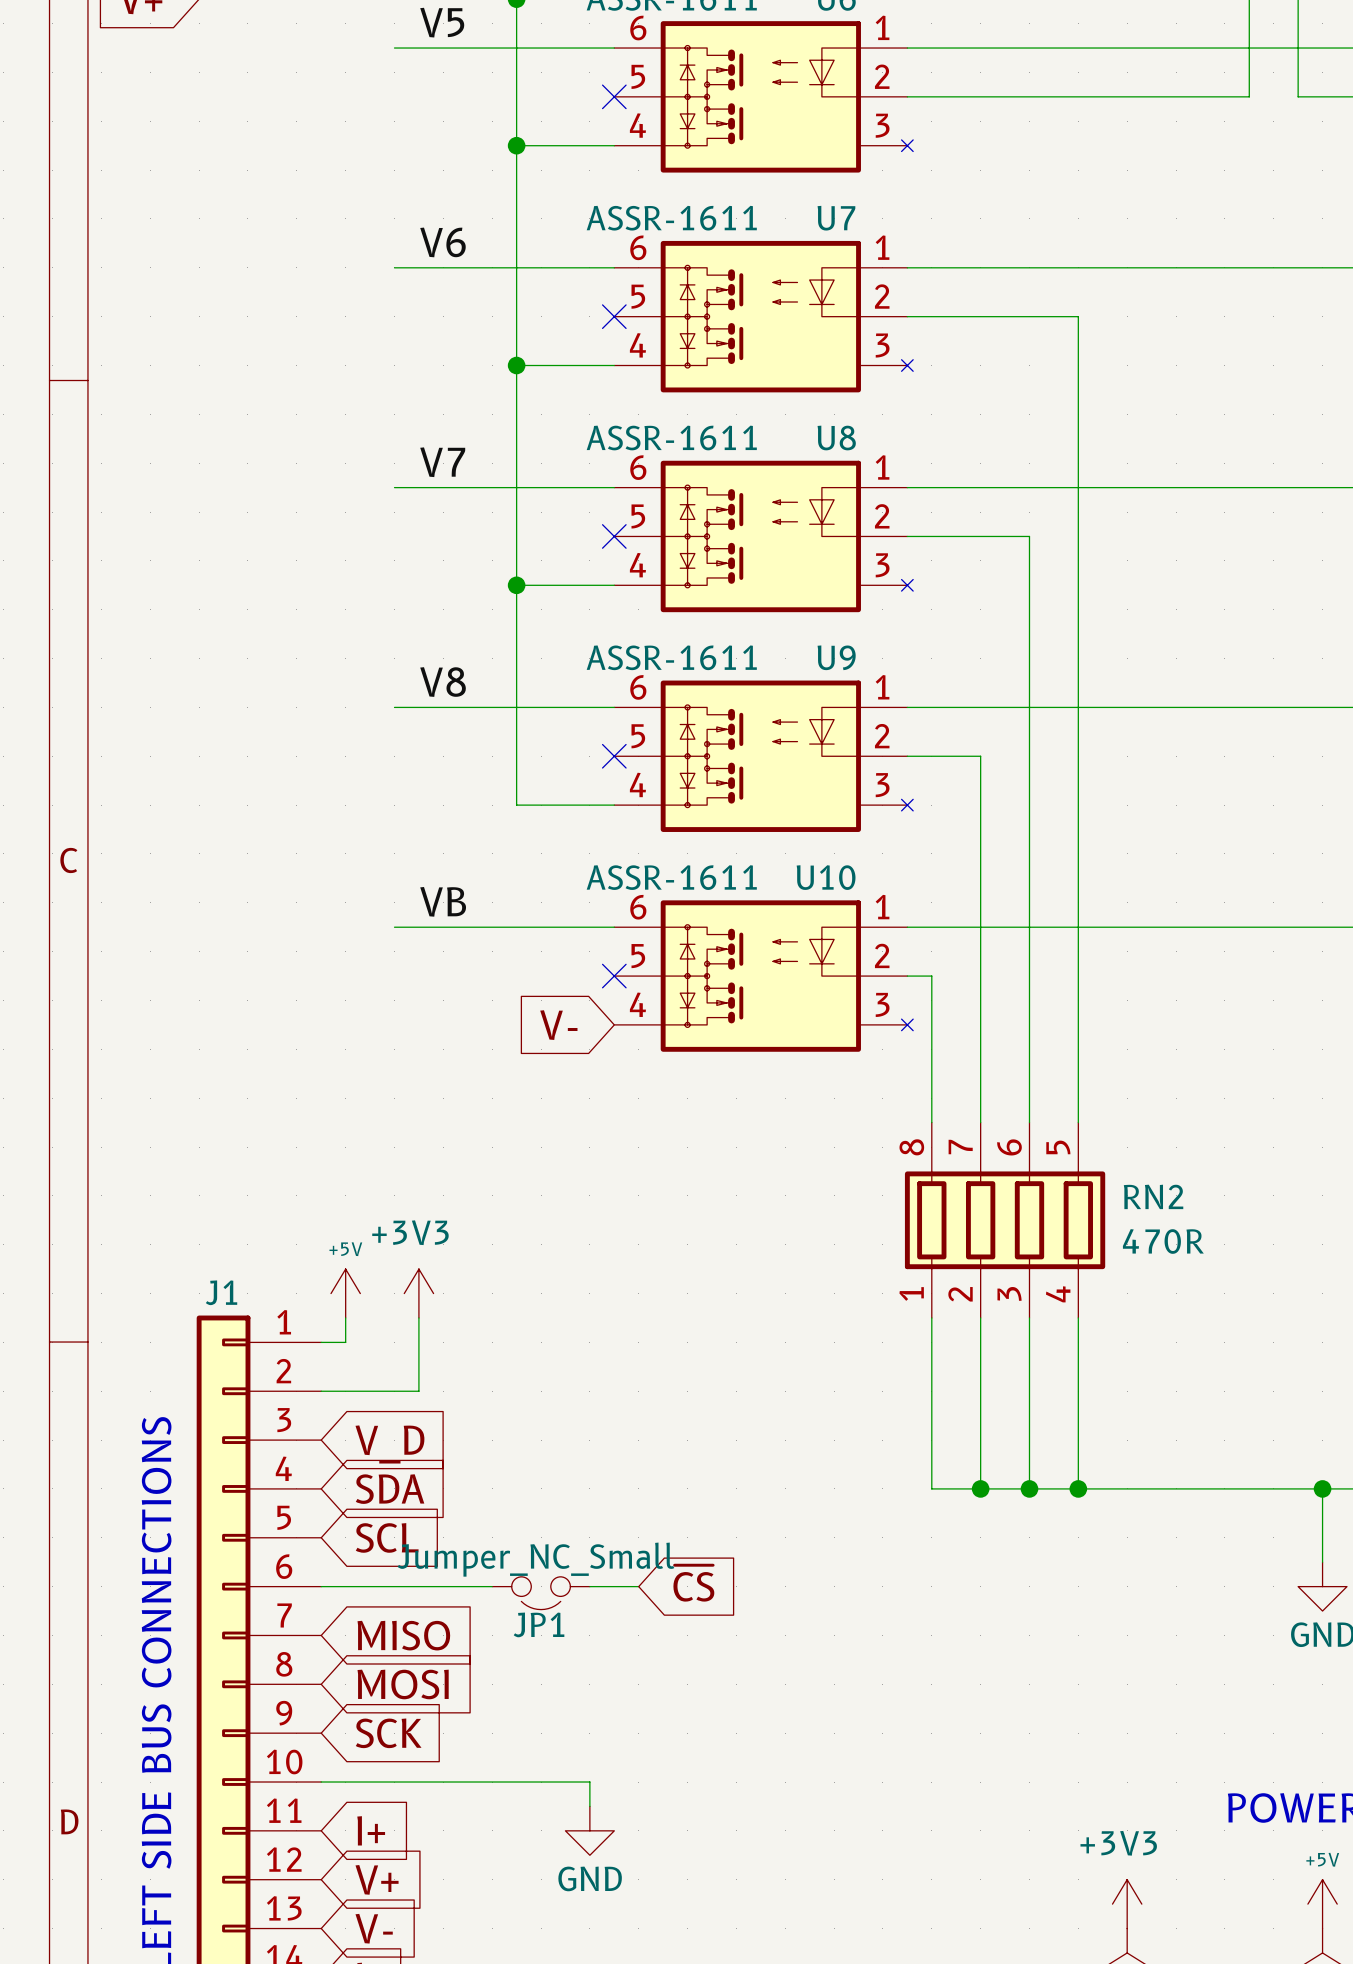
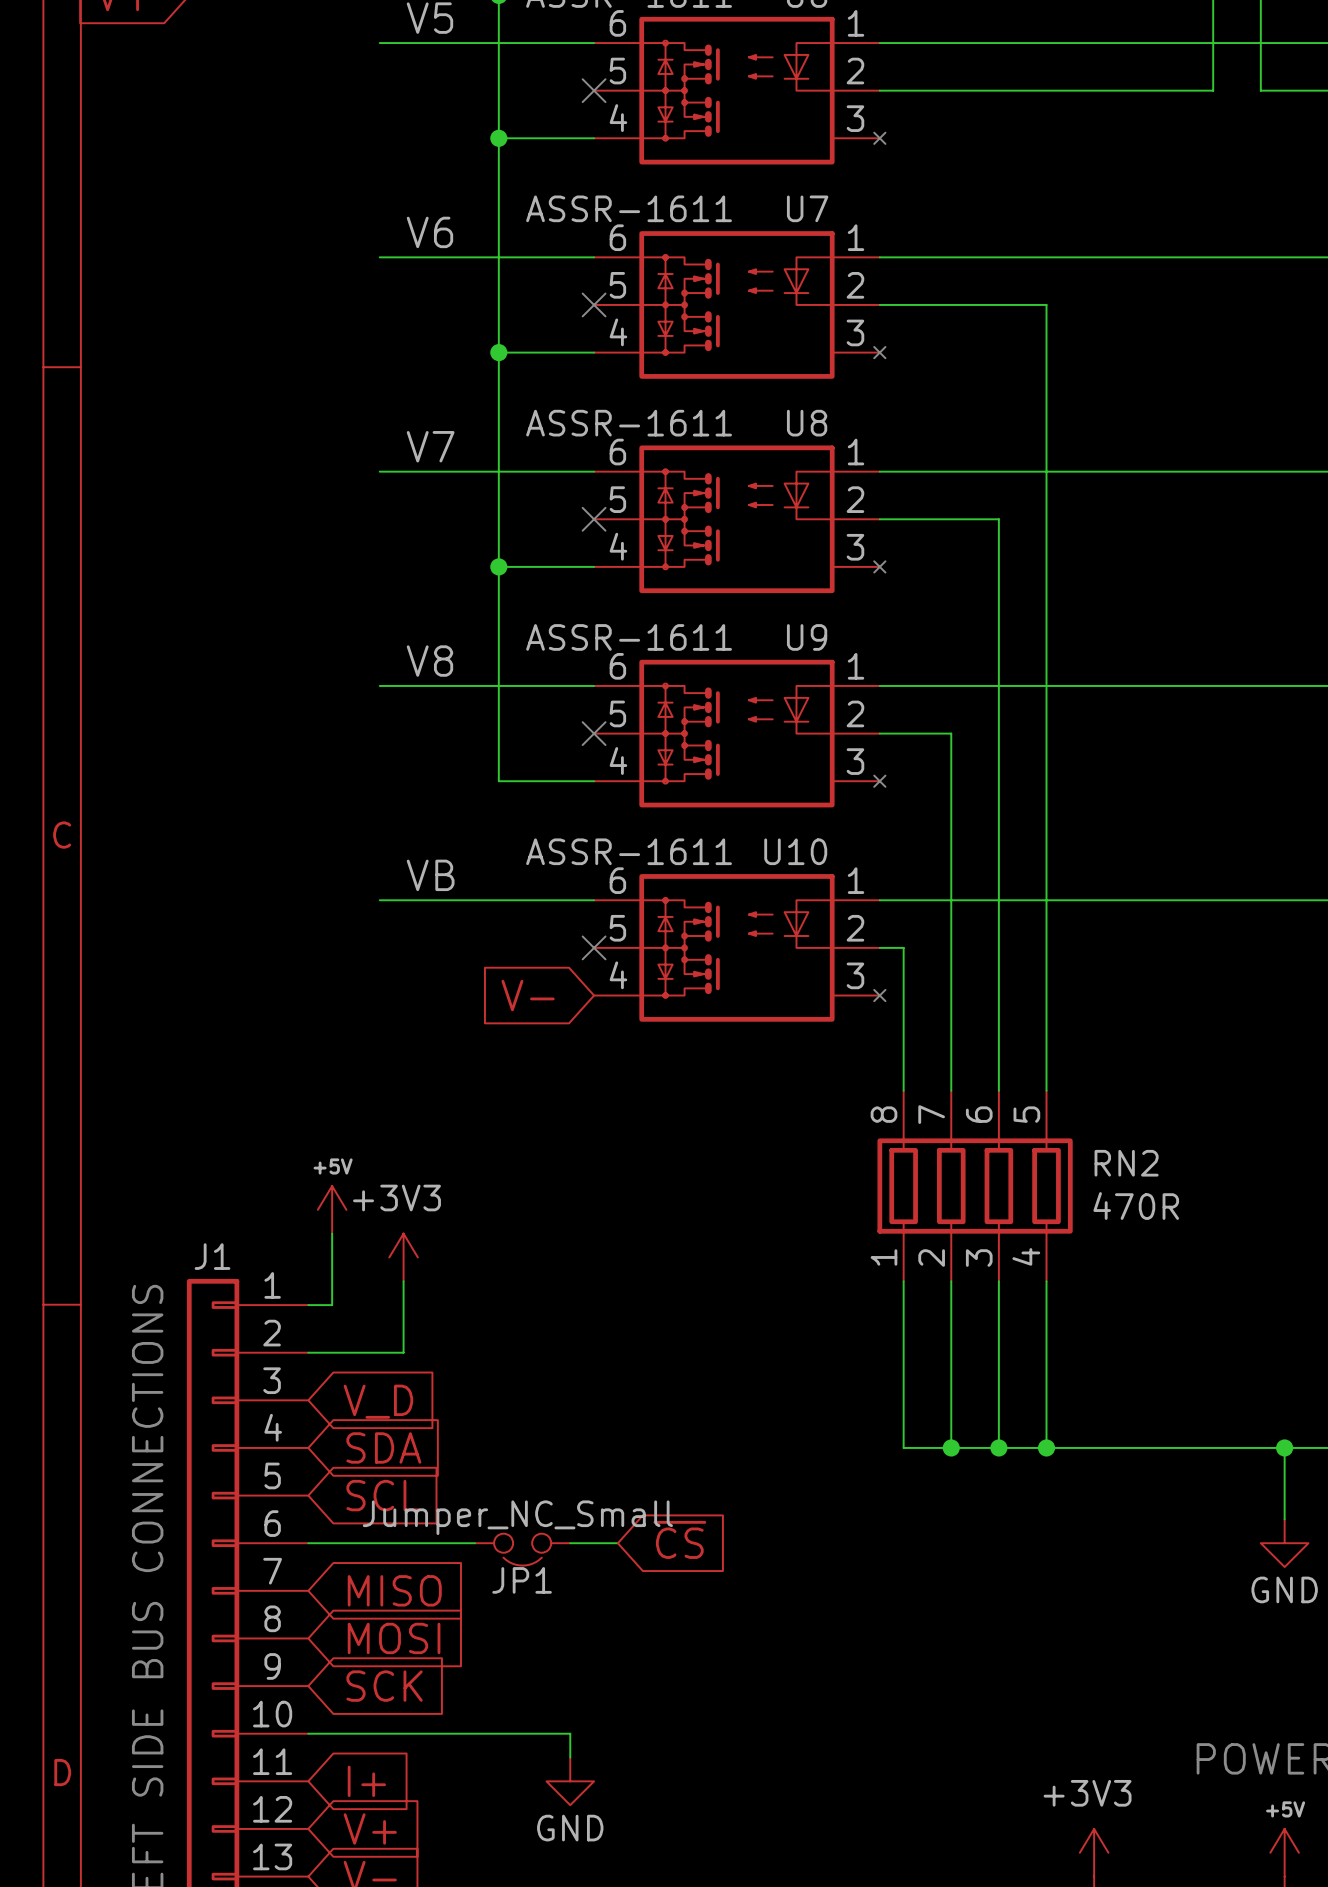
power symbol position: +5V (345, 1293) -> +5V (332, 1209)

